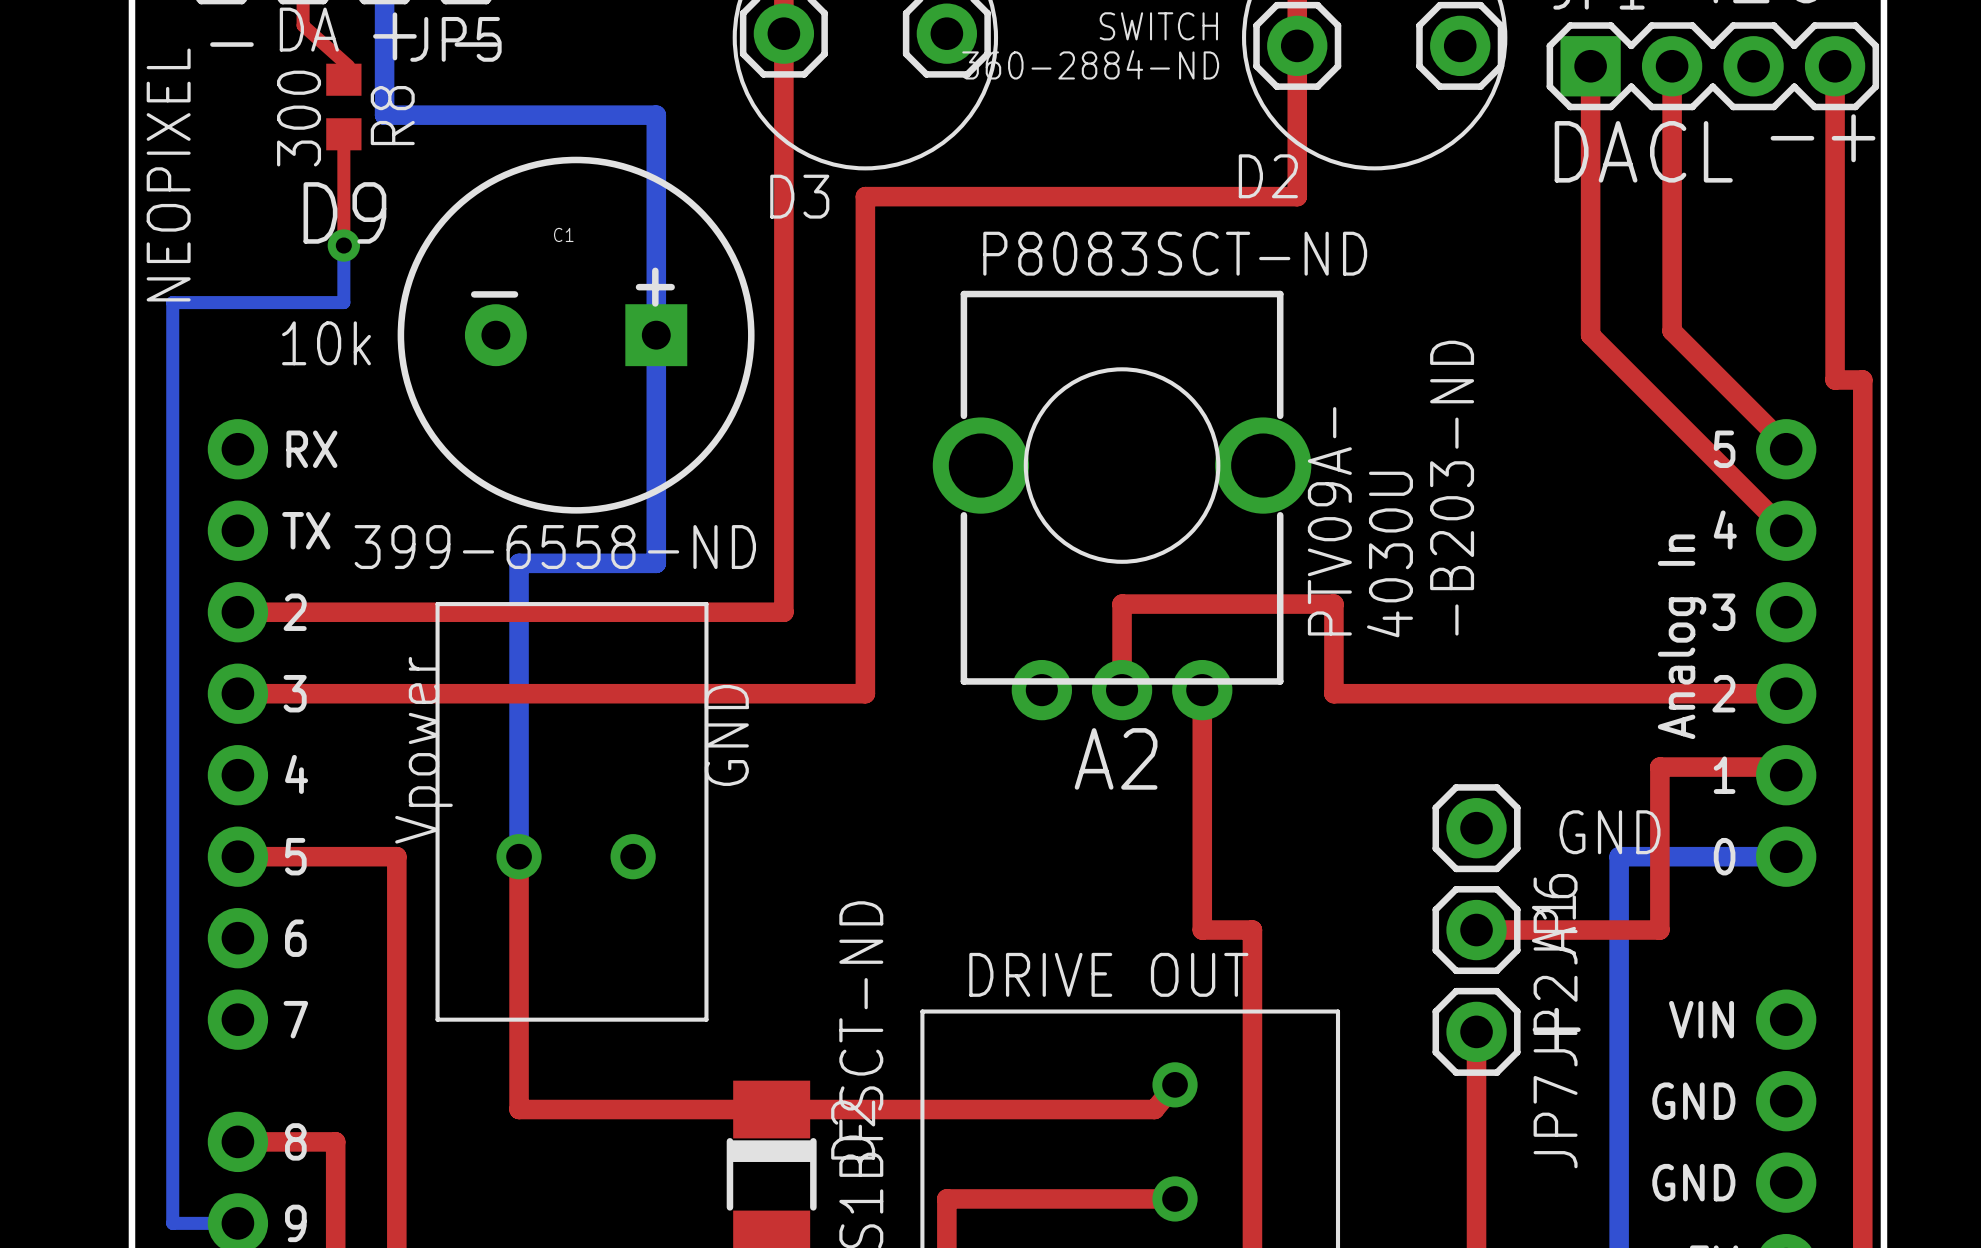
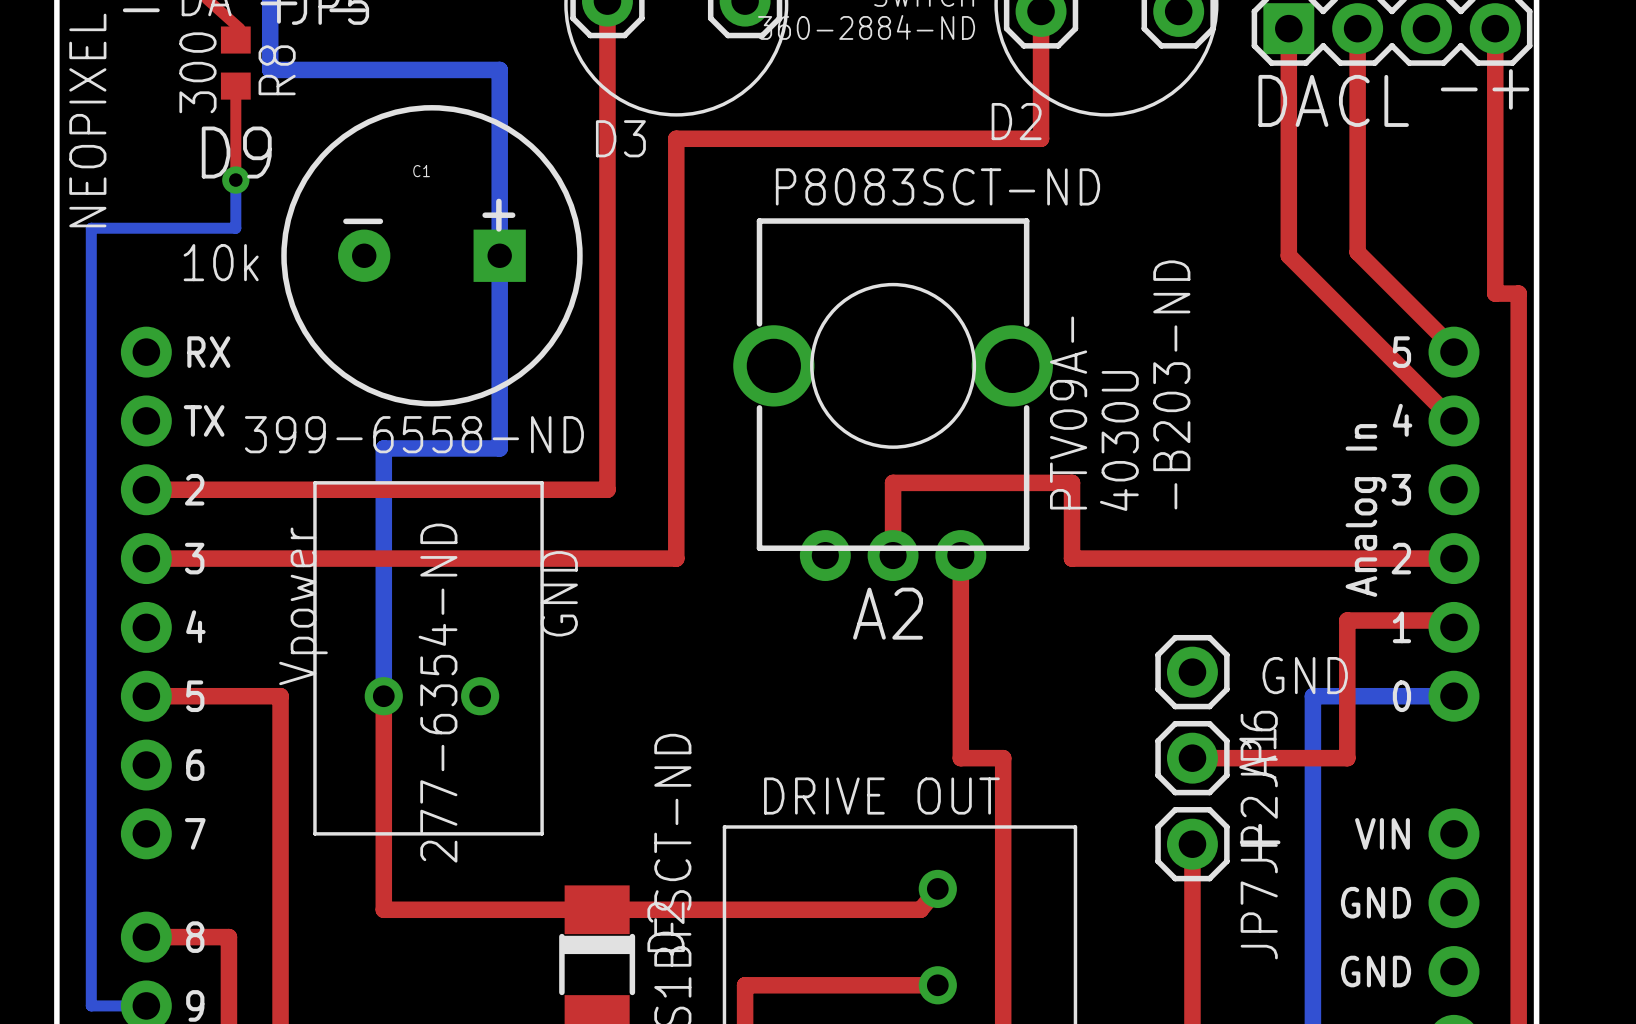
text: none -> 277-6354-ND (438, 693)

